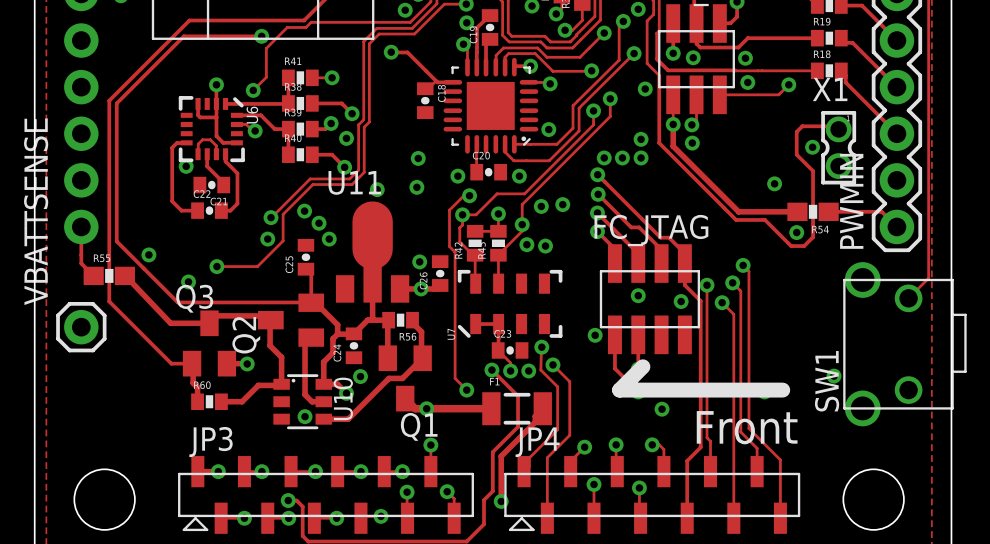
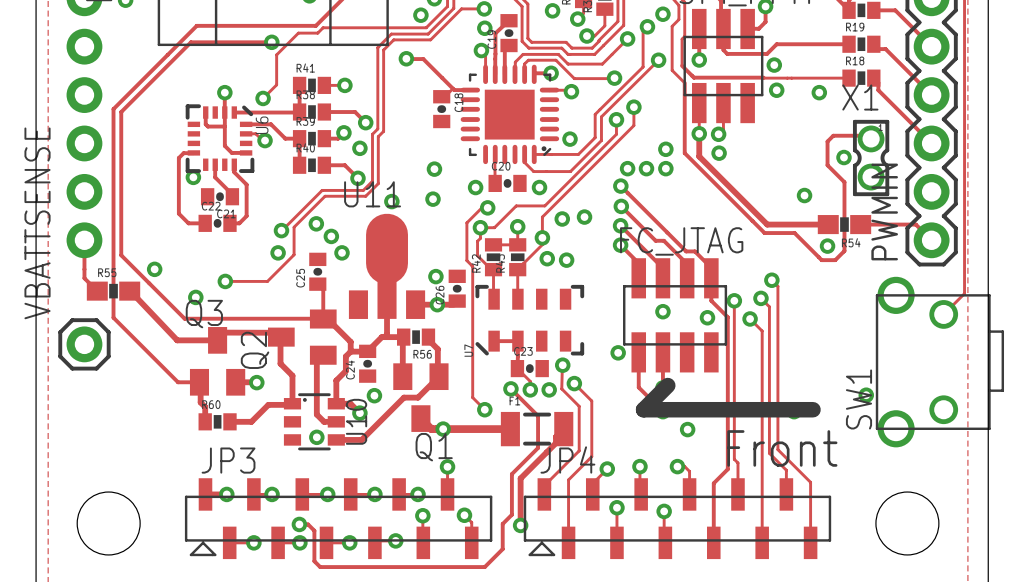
via: (693, 57) -> none
track: (788, 84) (778, 94) (719, 94) -> none
via: (645, 89) -> none
track: (198, 153) (198, 144) (202, 139) (210, 139) (216, 145) (216, 154) -> none

